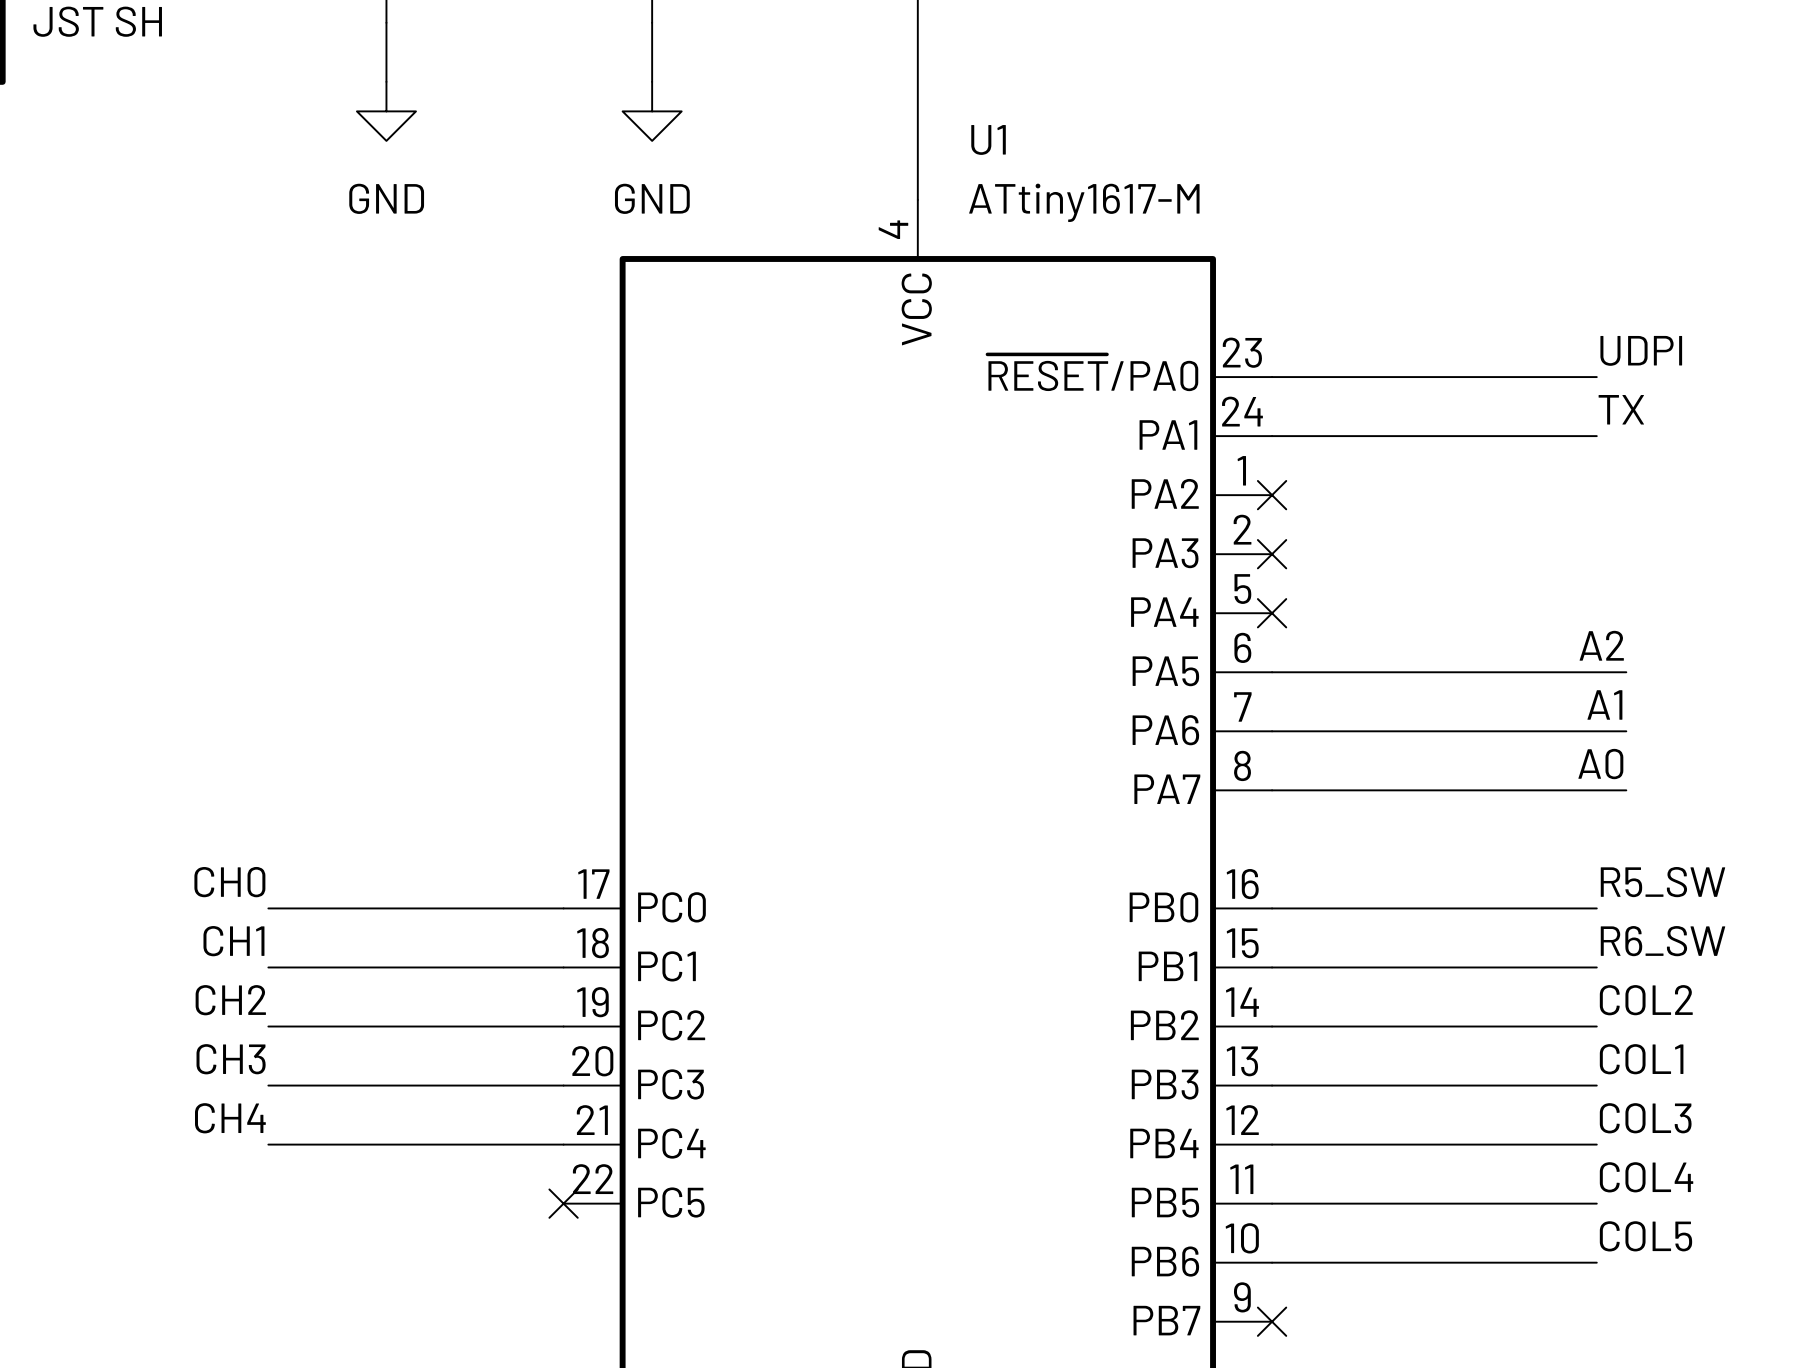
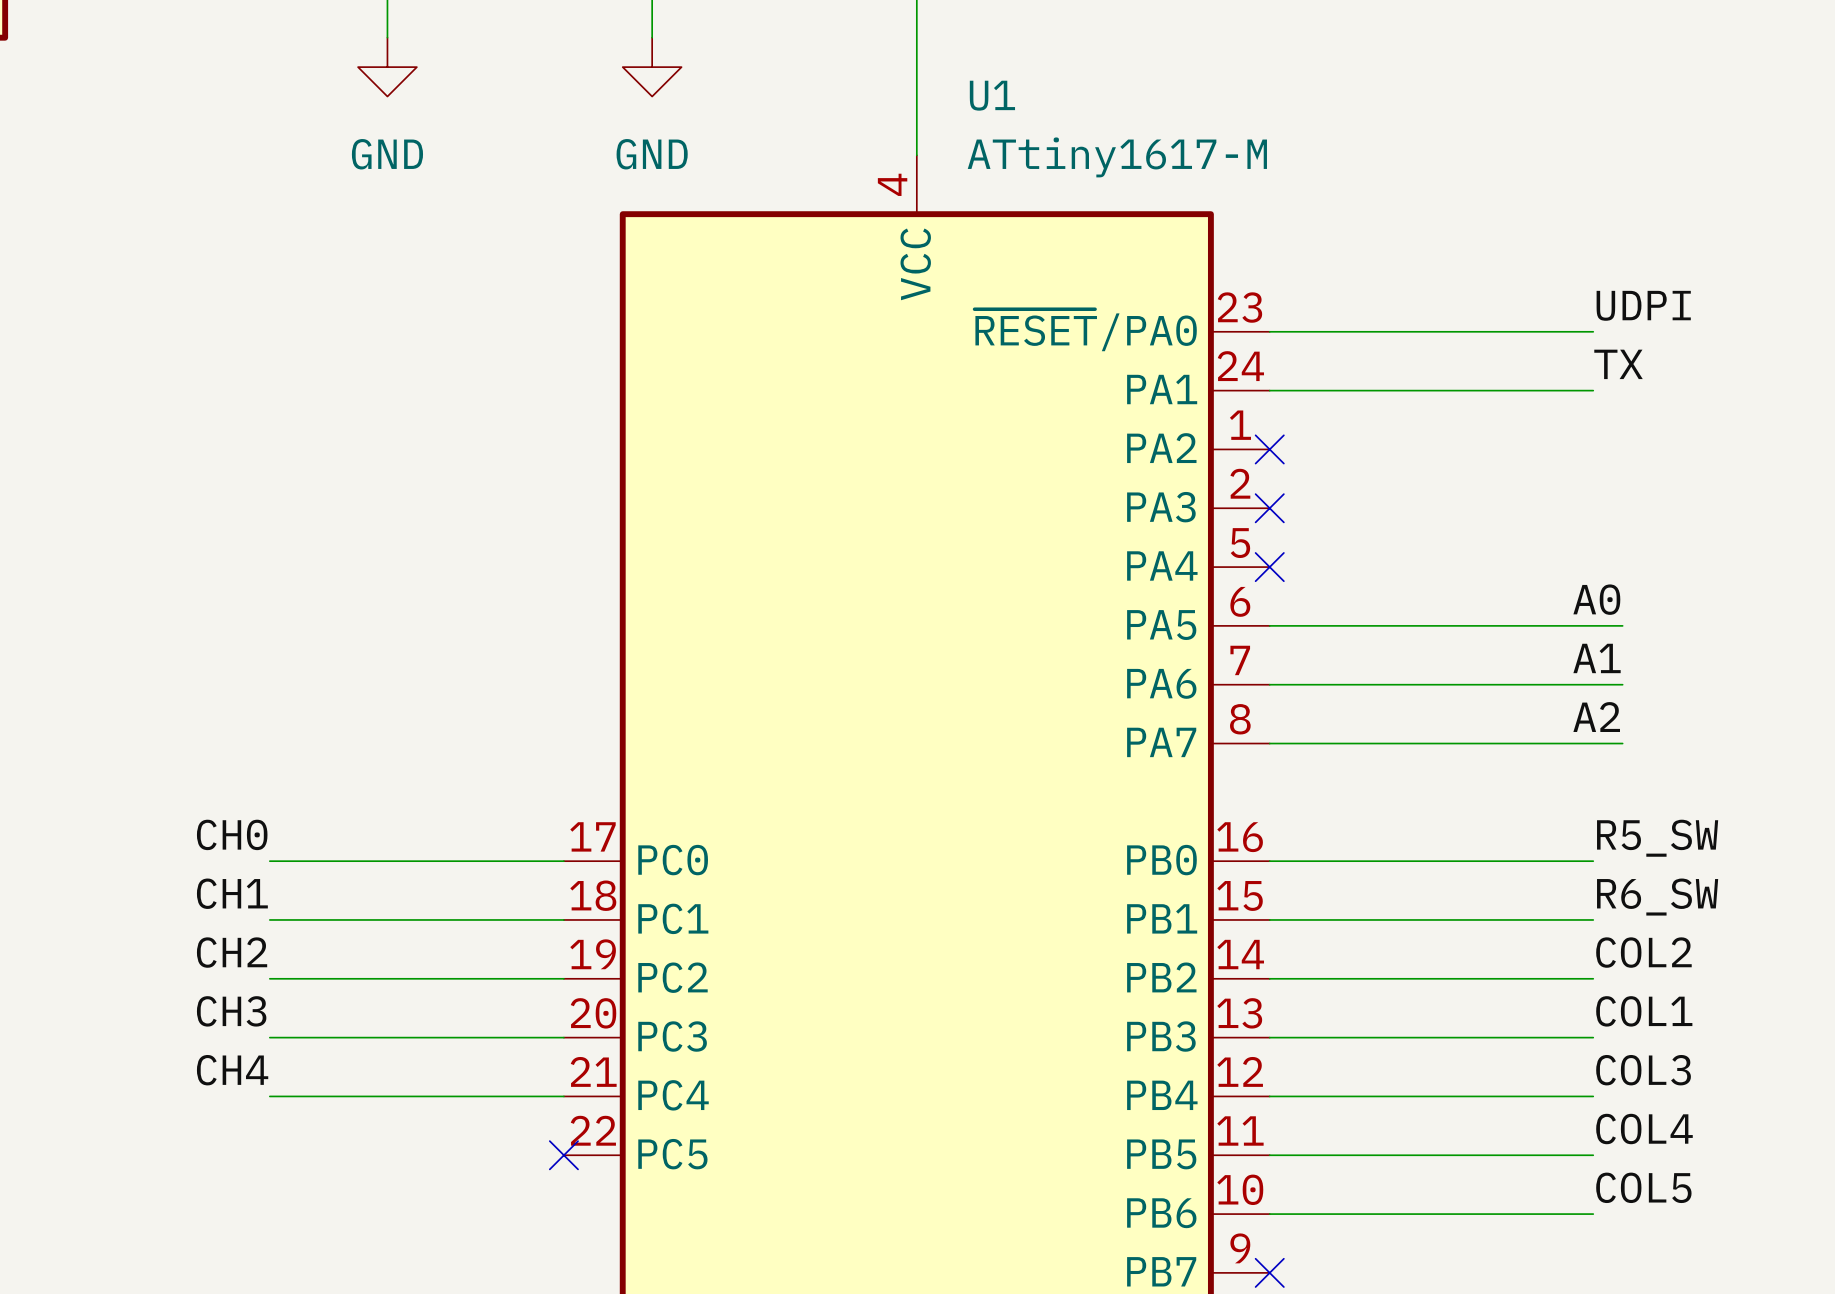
label: A2 (1601, 645) -> A0 (1596, 599)
label: A0 (1600, 764) -> A2 (1596, 717)

